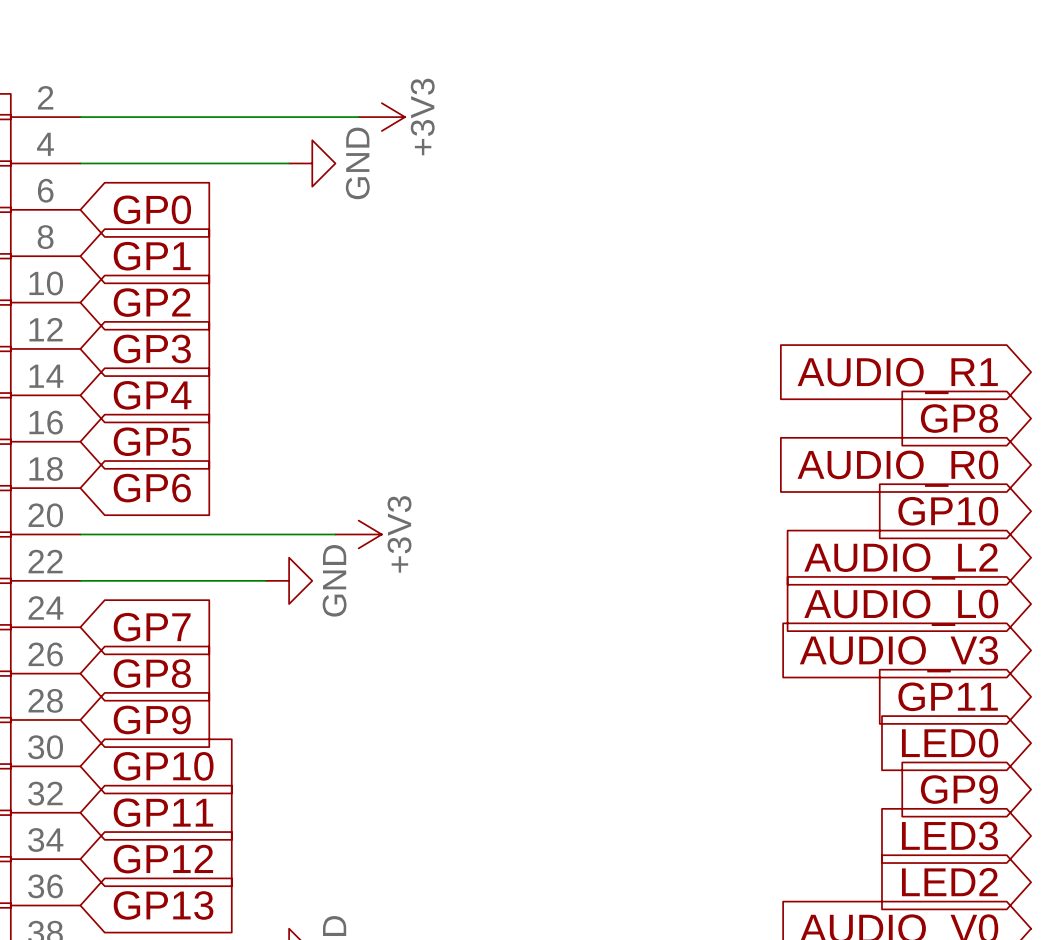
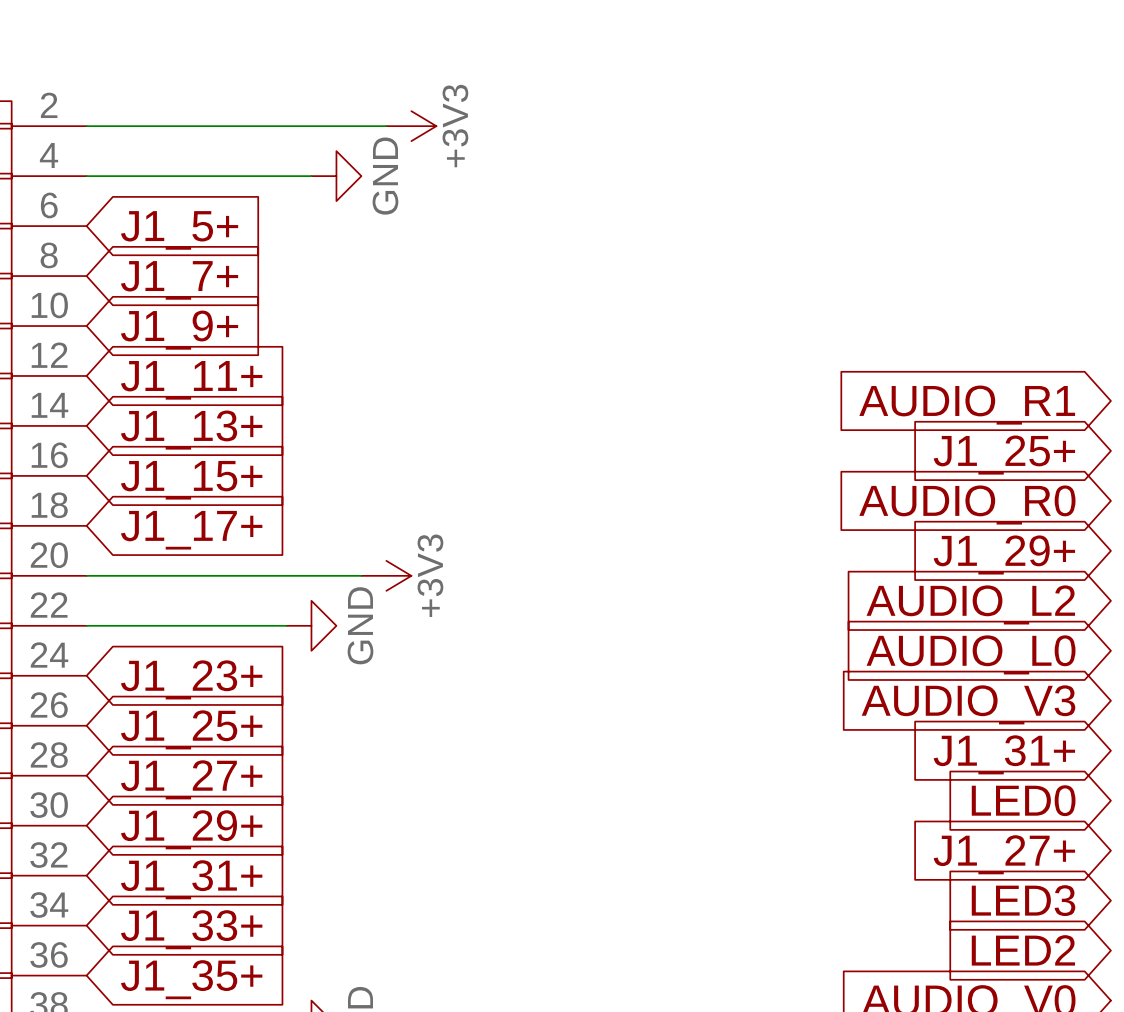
global label: GP0 (152, 209) -> J1_5+ (179, 230)
global label: GP1 (152, 256) -> J1_7+ (179, 280)
global label: GP2 (152, 302) -> J1_9+ (179, 330)
global label: GP3 (152, 348) -> J1_11+ (191, 380)
global label: GP4 (152, 395) -> J1_13+ (191, 430)
global label: GP8 (959, 418) -> J1_25+ (1004, 455)
global label: GP5 (152, 441) -> J1_15+ (191, 480)
global label: GP6 (152, 488) -> J1_17+ (191, 530)
global label: GP10 (948, 511) -> J1_29+ (1004, 554)
global label: GP7 (152, 627) -> J1_23+ (191, 679)
global label: GP8 (152, 673) -> J1_25+ (191, 729)
global label: GP11 (948, 696) -> J1_31+ (1004, 754)
global label: GP9 (152, 719) -> J1_27+ (191, 779)
global label: GP10 (163, 766) -> J1_29+ (191, 829)
global label: GP9 (959, 789) -> J1_27+ (1004, 854)
global label: GP11 (163, 812) -> J1_31+ (191, 879)
global label: GP12 (163, 859) -> J1_33+ (191, 929)
global label: GP13 (163, 905) -> J1_35+ (191, 979)

